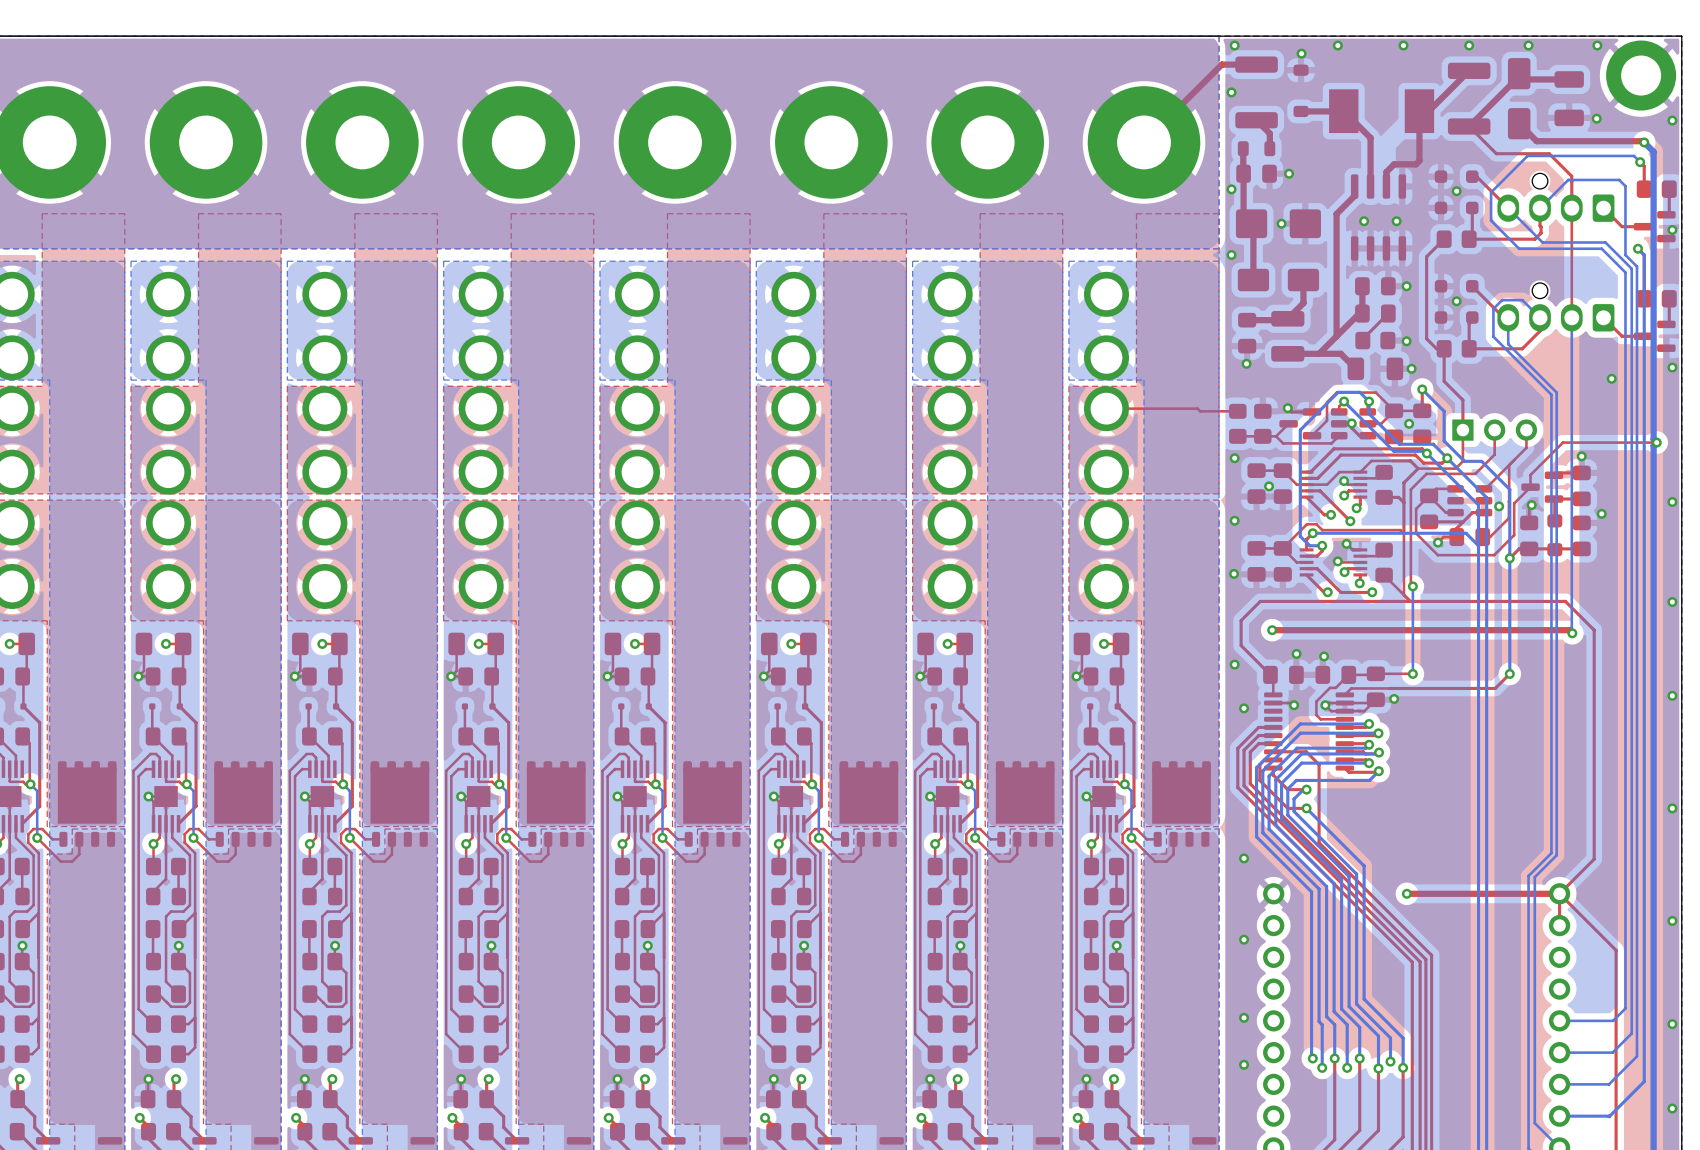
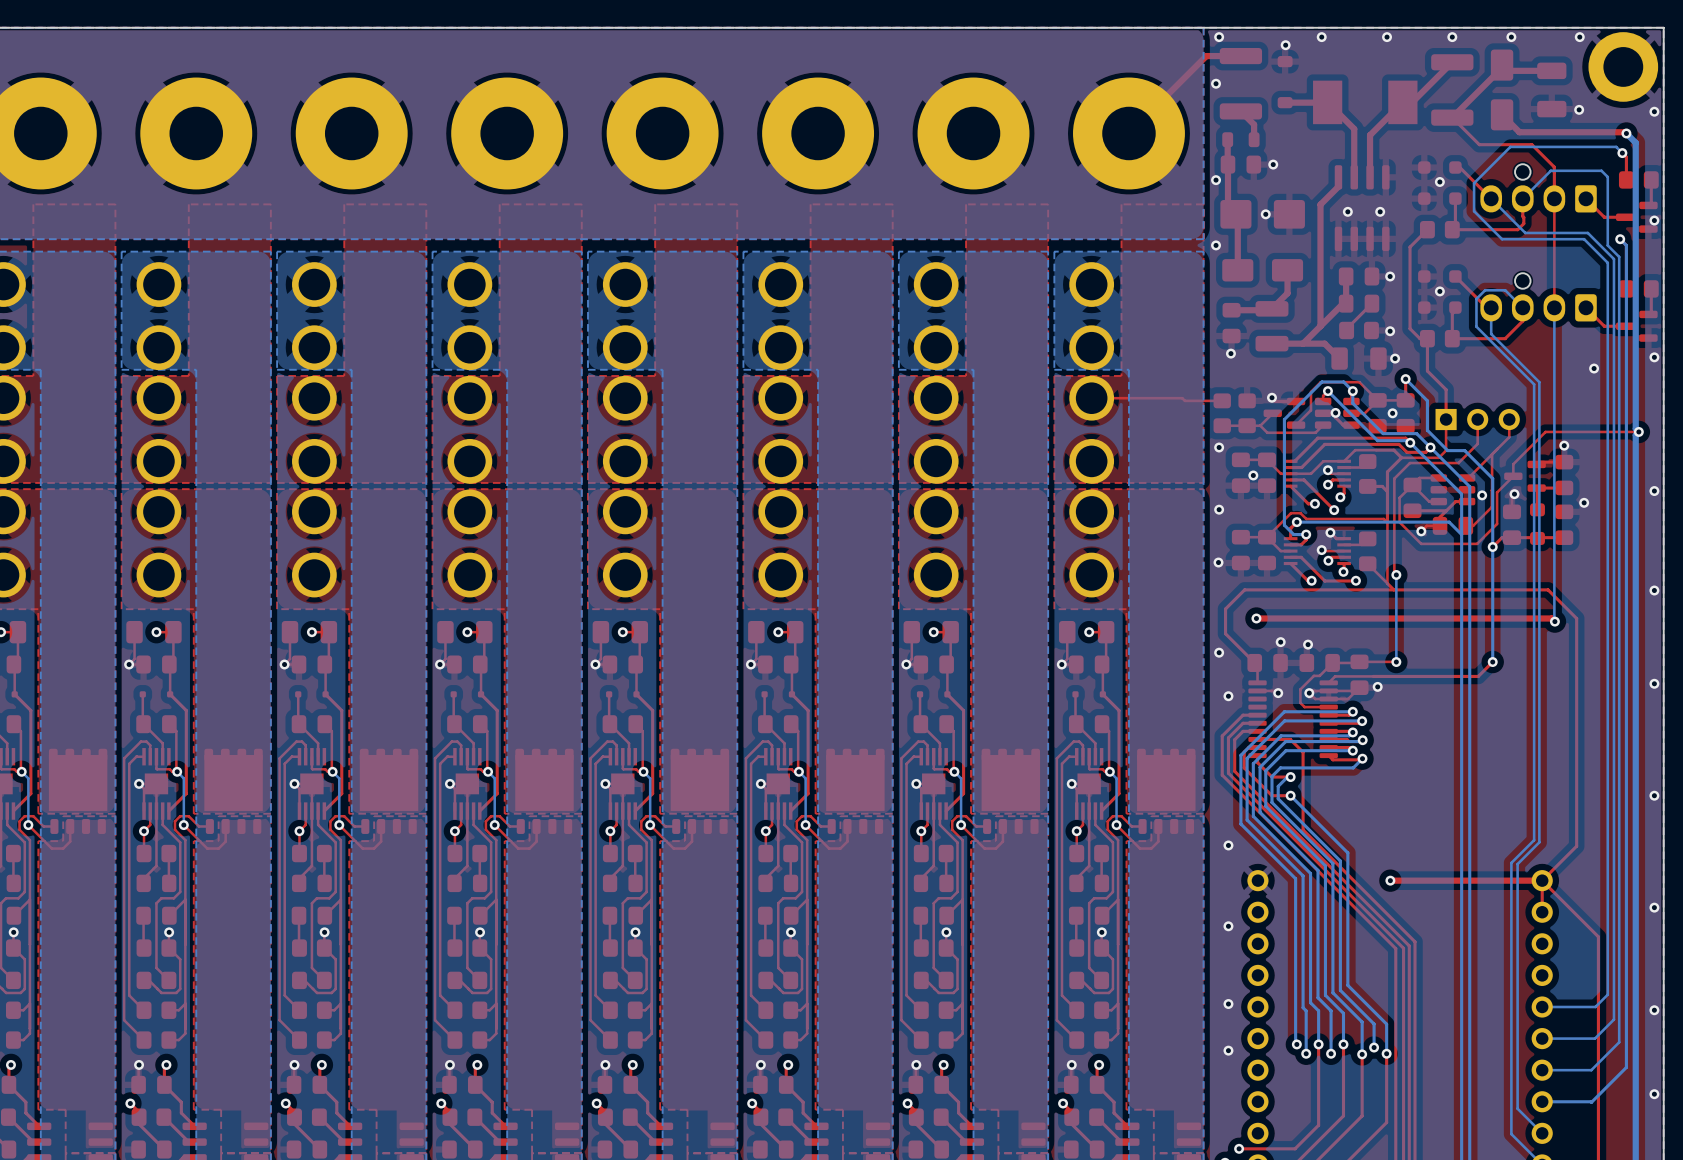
top track: (1419, 111) (1419, 160) (1416, 164) (1394, 164) (1386, 172) -> (1402, 102) (1370, 135) (1370, 162)

